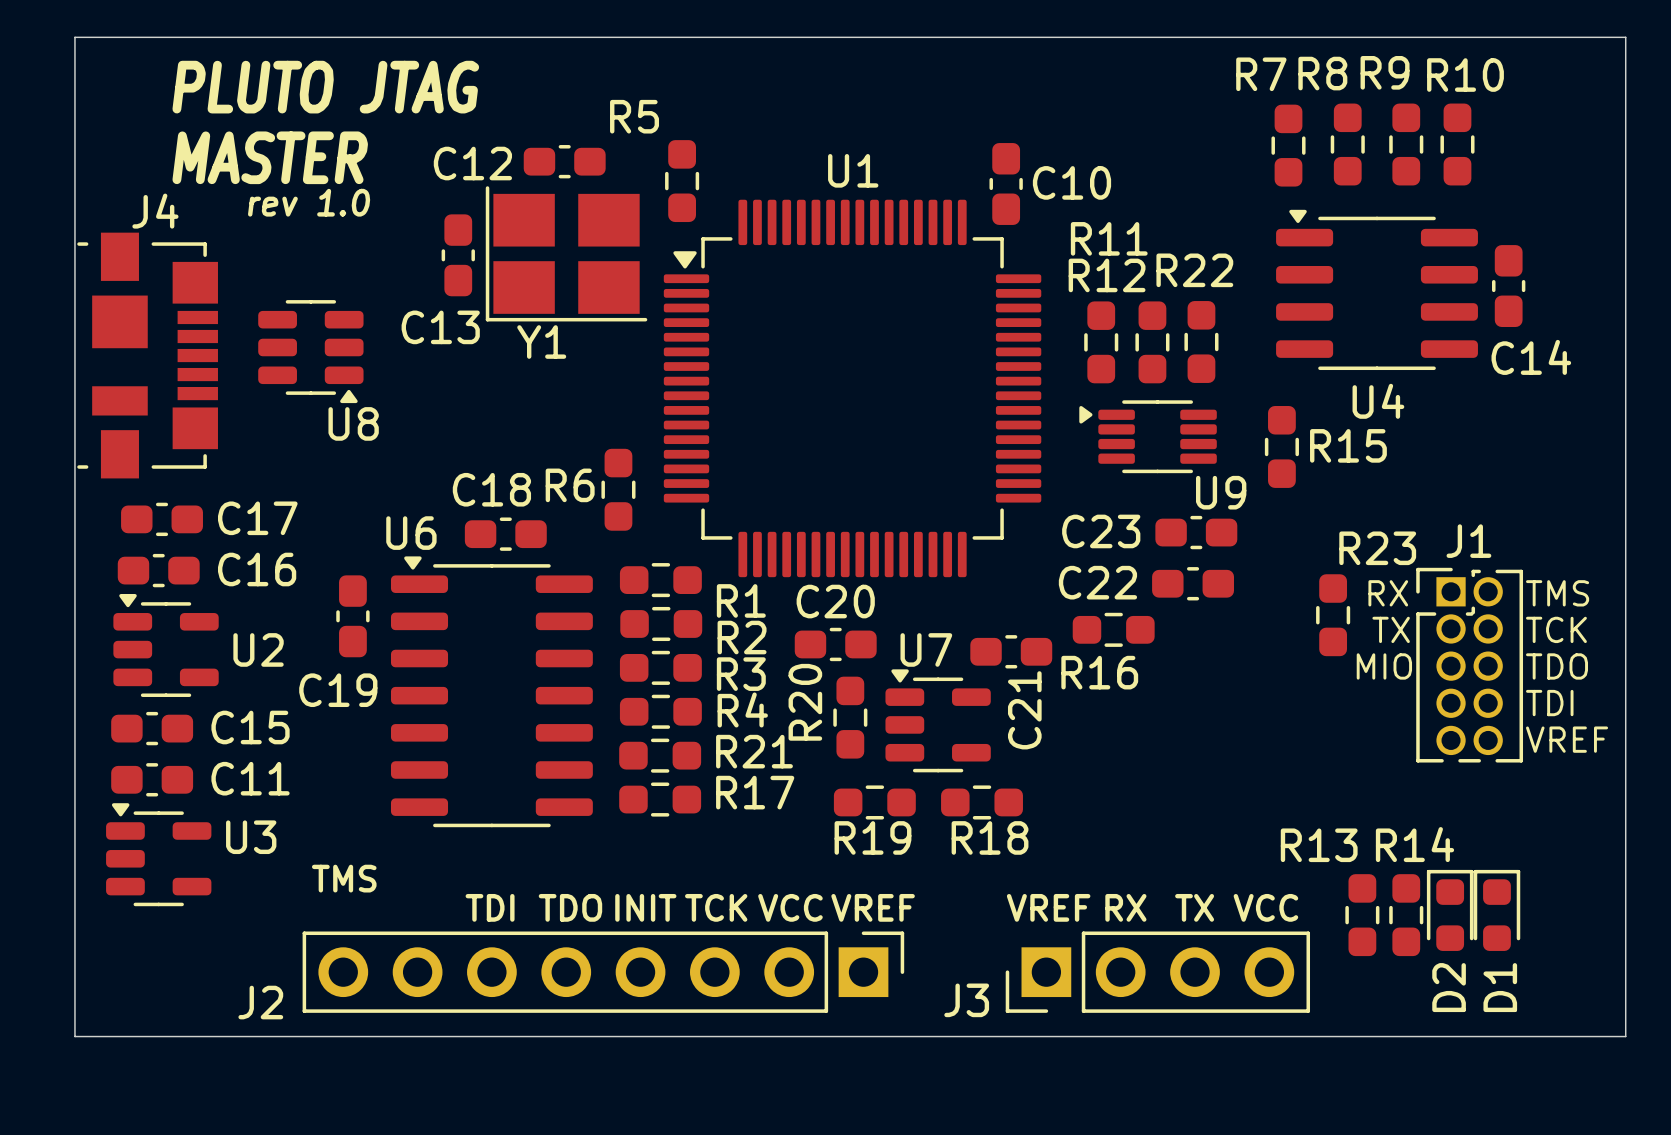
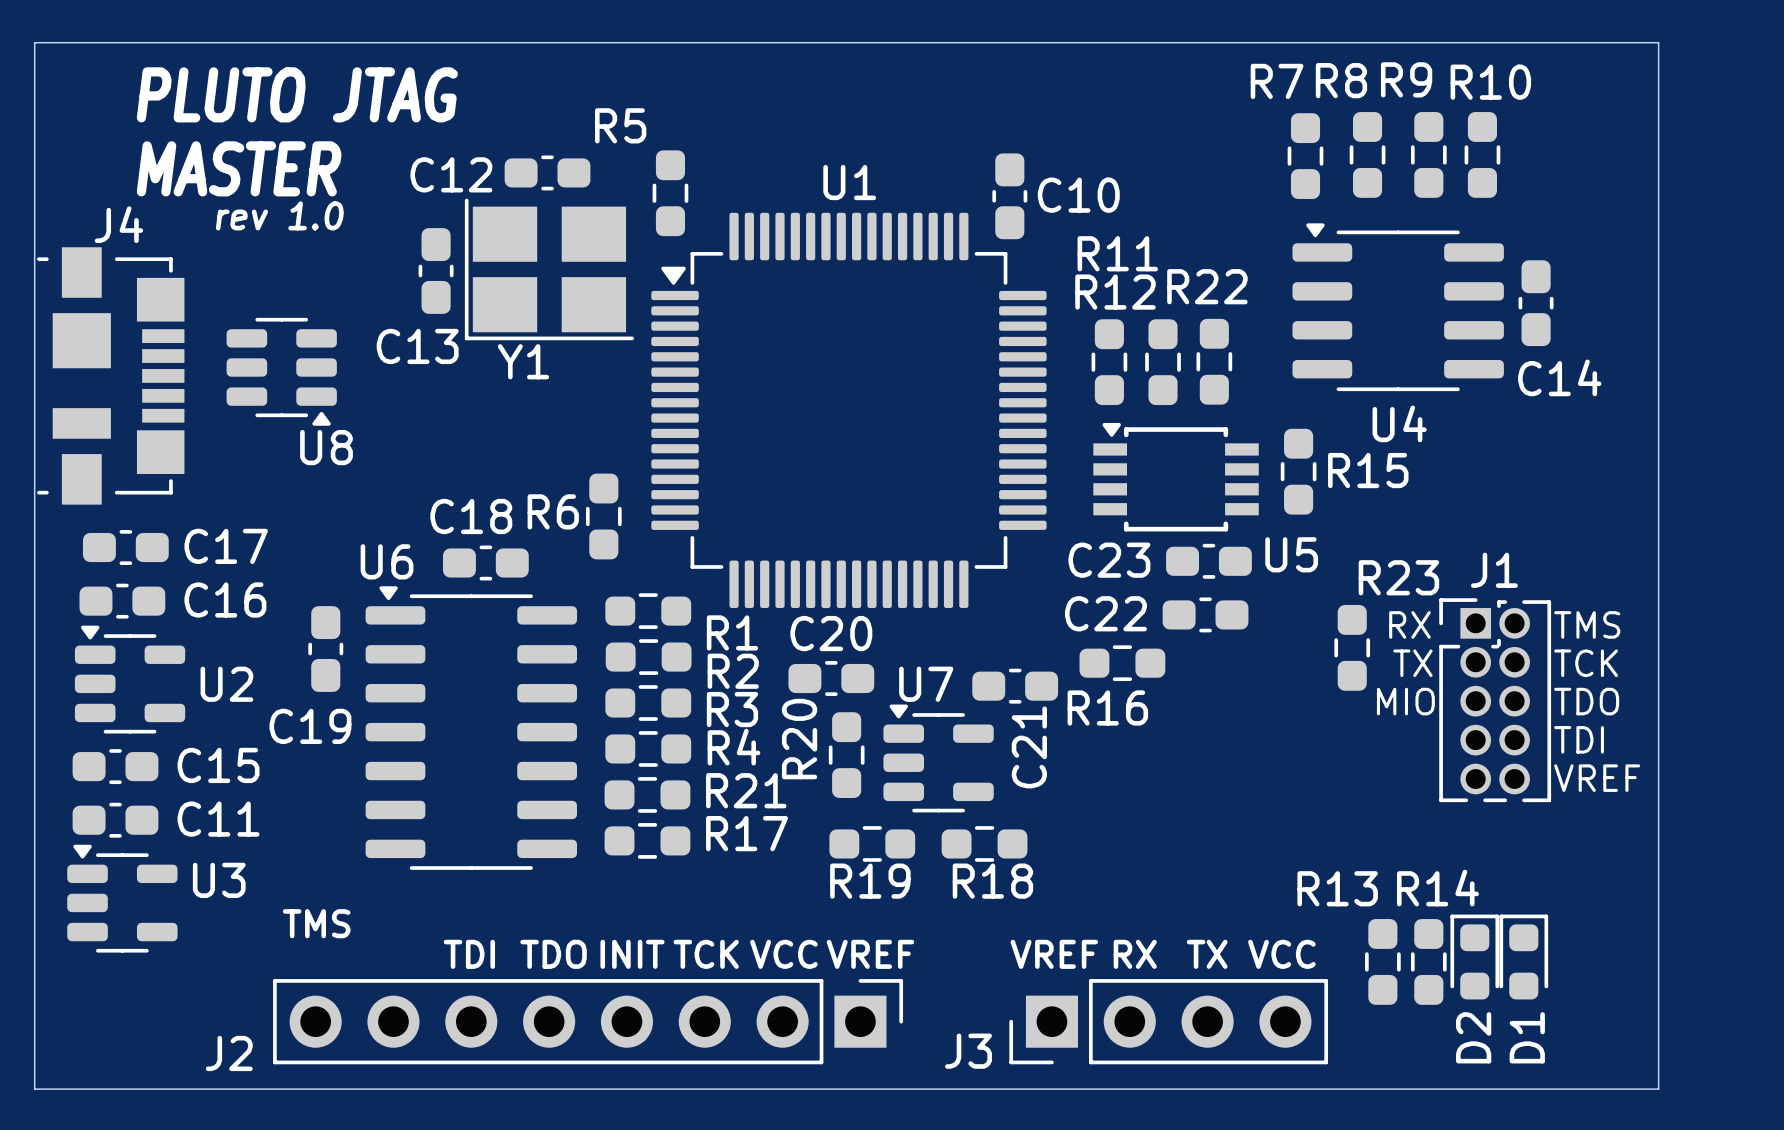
U9: (1148, 436) -> none
U5: none -> (1176, 477)

